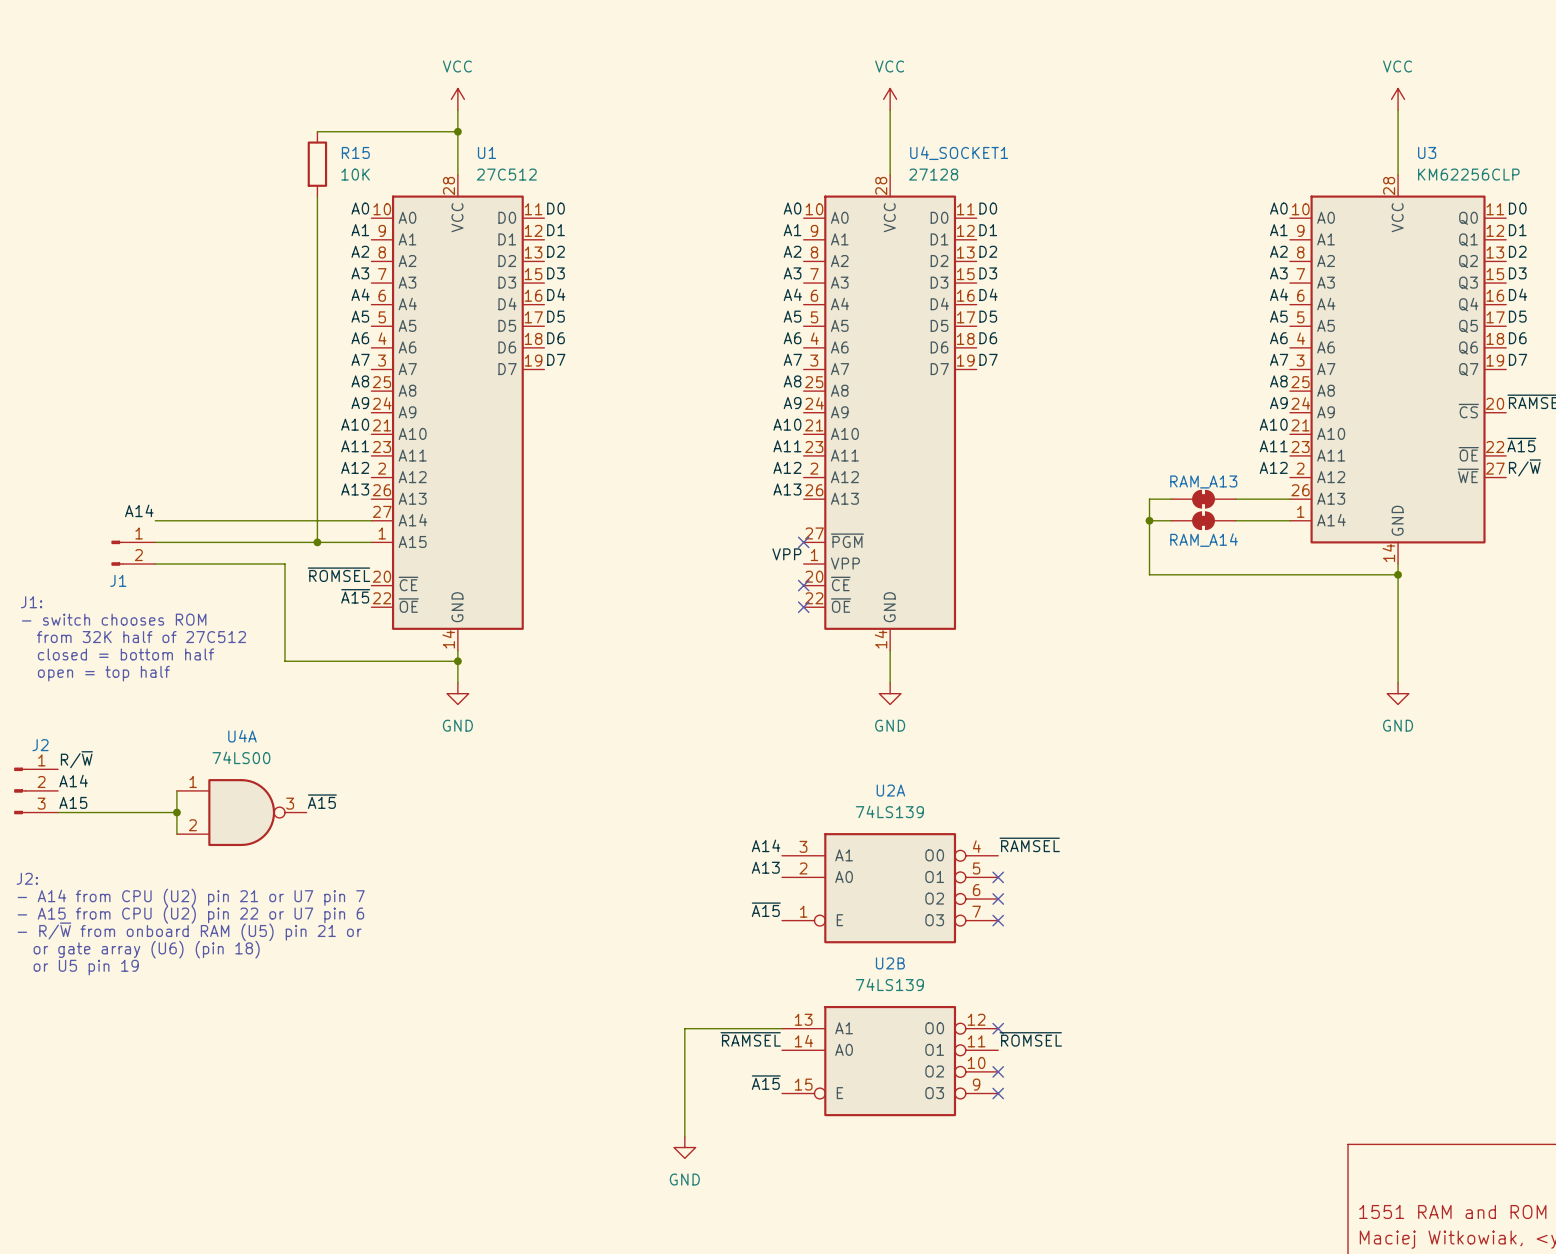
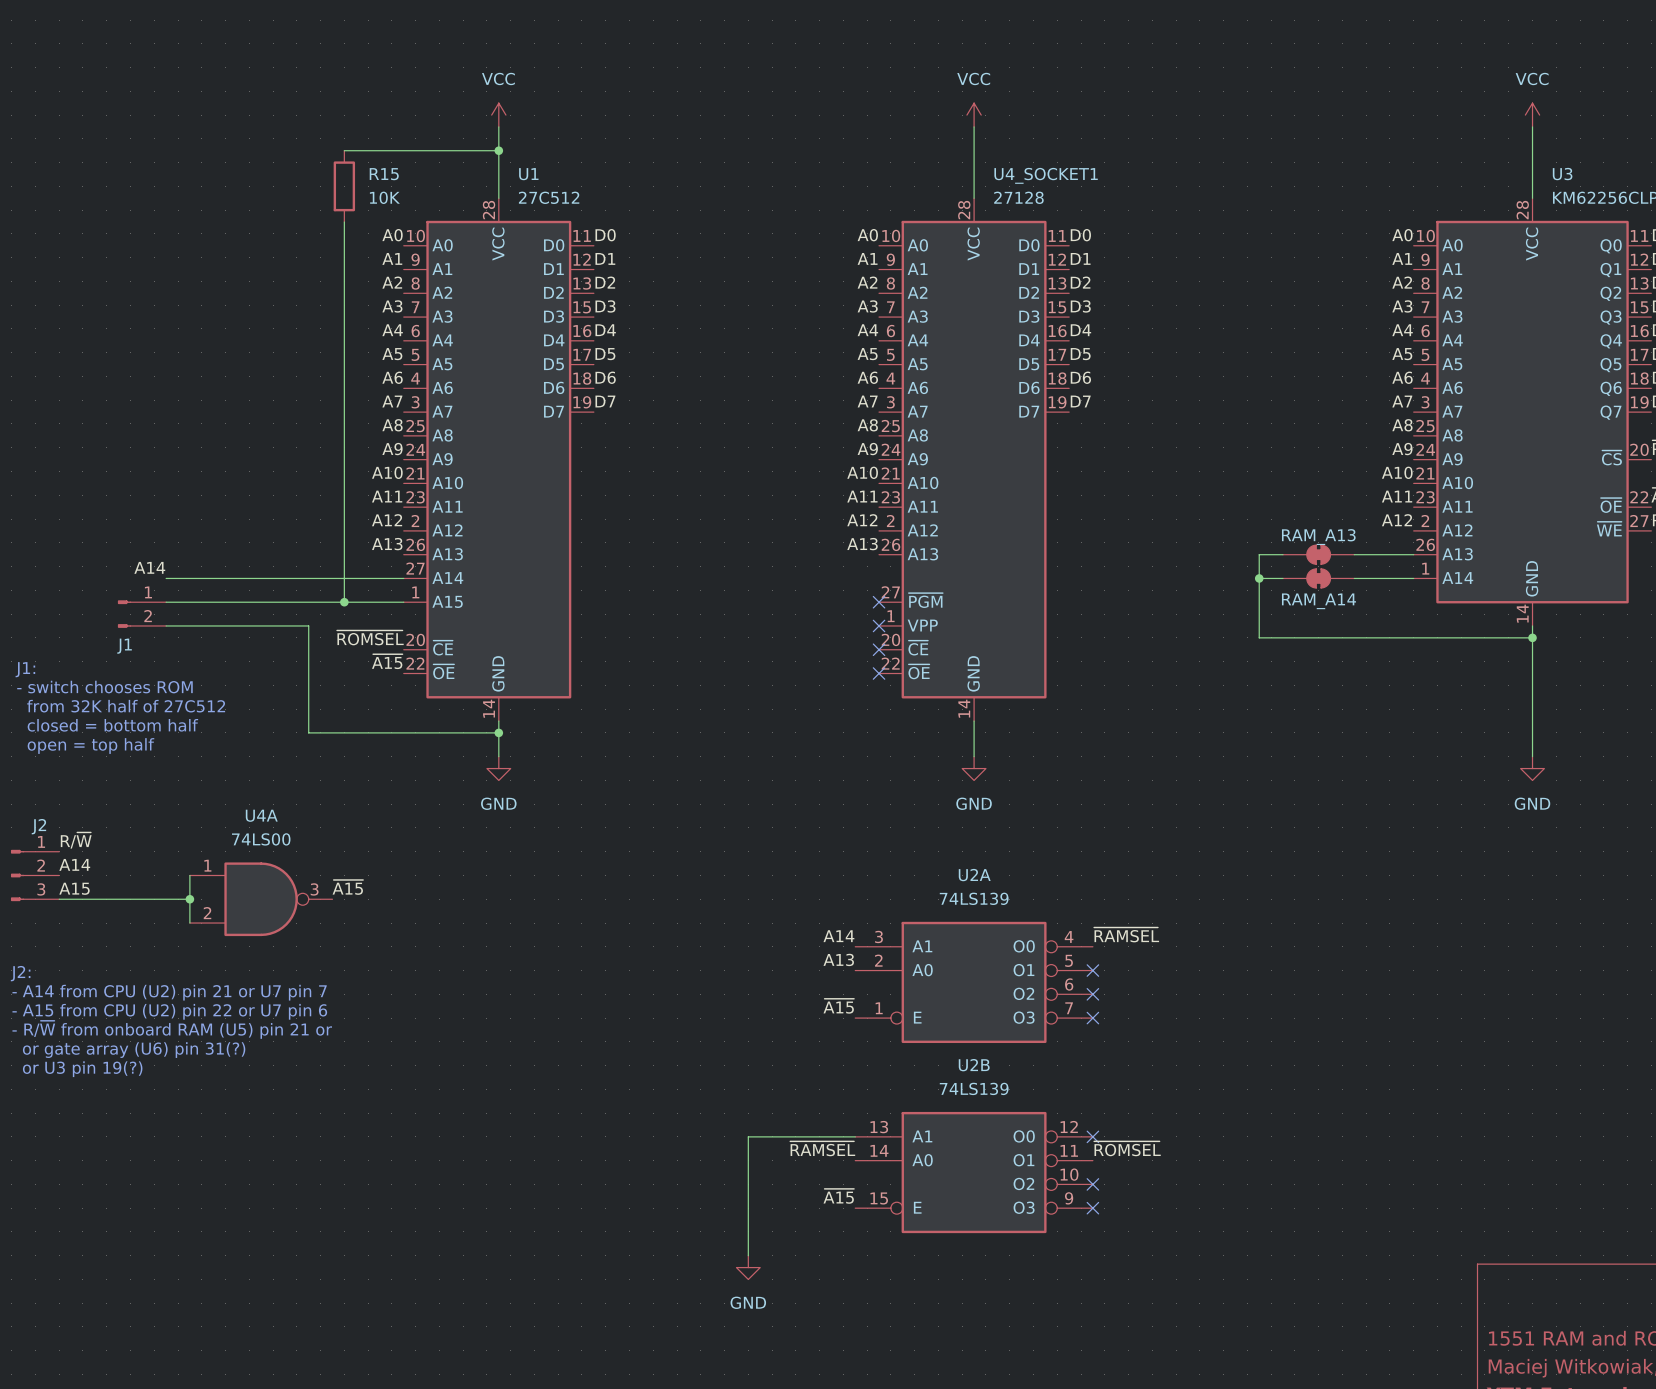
label: VPP (786, 554) -> none
no-connect mark: none -> (879, 625)
text: or gate array (U6) (pin 18) (146, 949) -> or gate array (U6) pin 31(?) (134, 1050)
text: or U5 pin 19 (86, 967) -> or U3 pin 19(?) (82, 1069)

